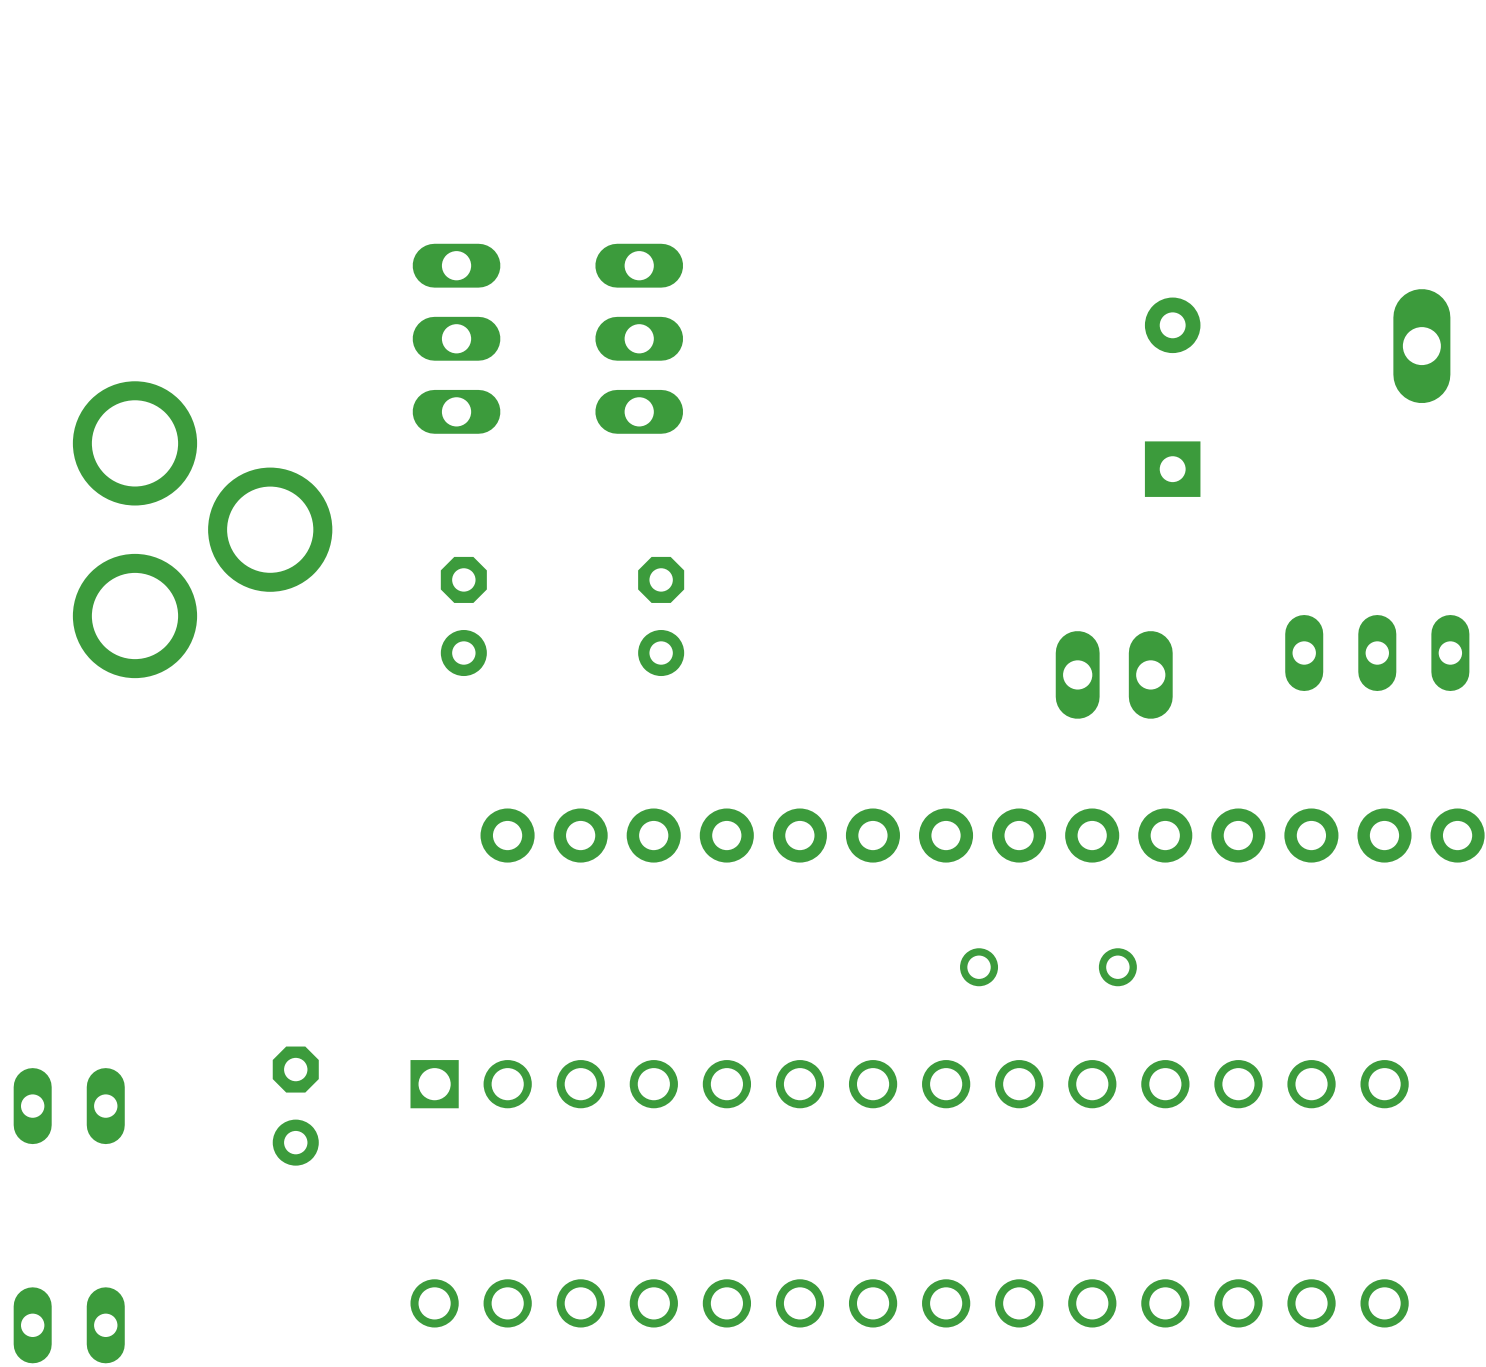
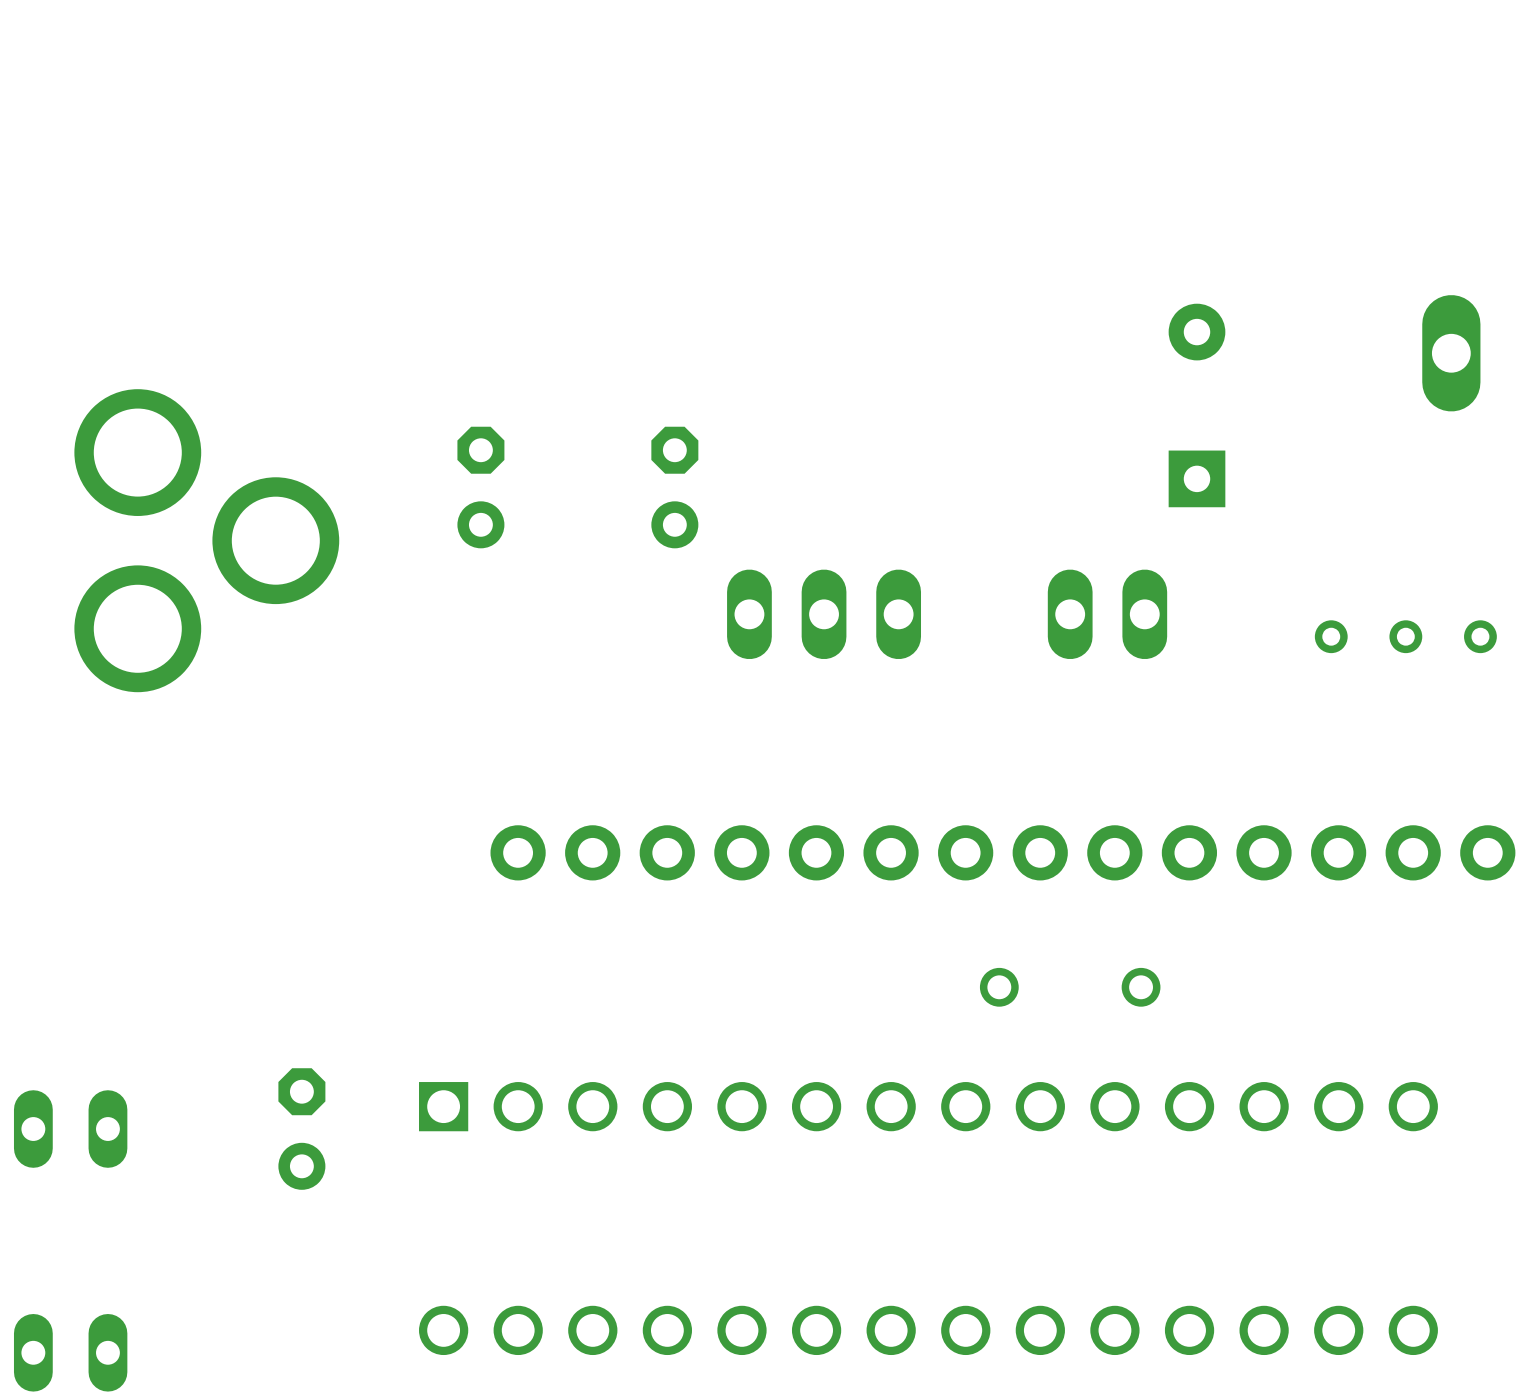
part: (456, 338) -> none
part: (639, 338) -> none
part: none -> (480, 487)
part: none -> (674, 487)
part: none -> (824, 614)
part: (463, 616) -> none
part: (661, 616) -> none
part: none -> (1405, 636)
part: (1377, 653) -> none
part position: (1114, 674) -> (1107, 614)

